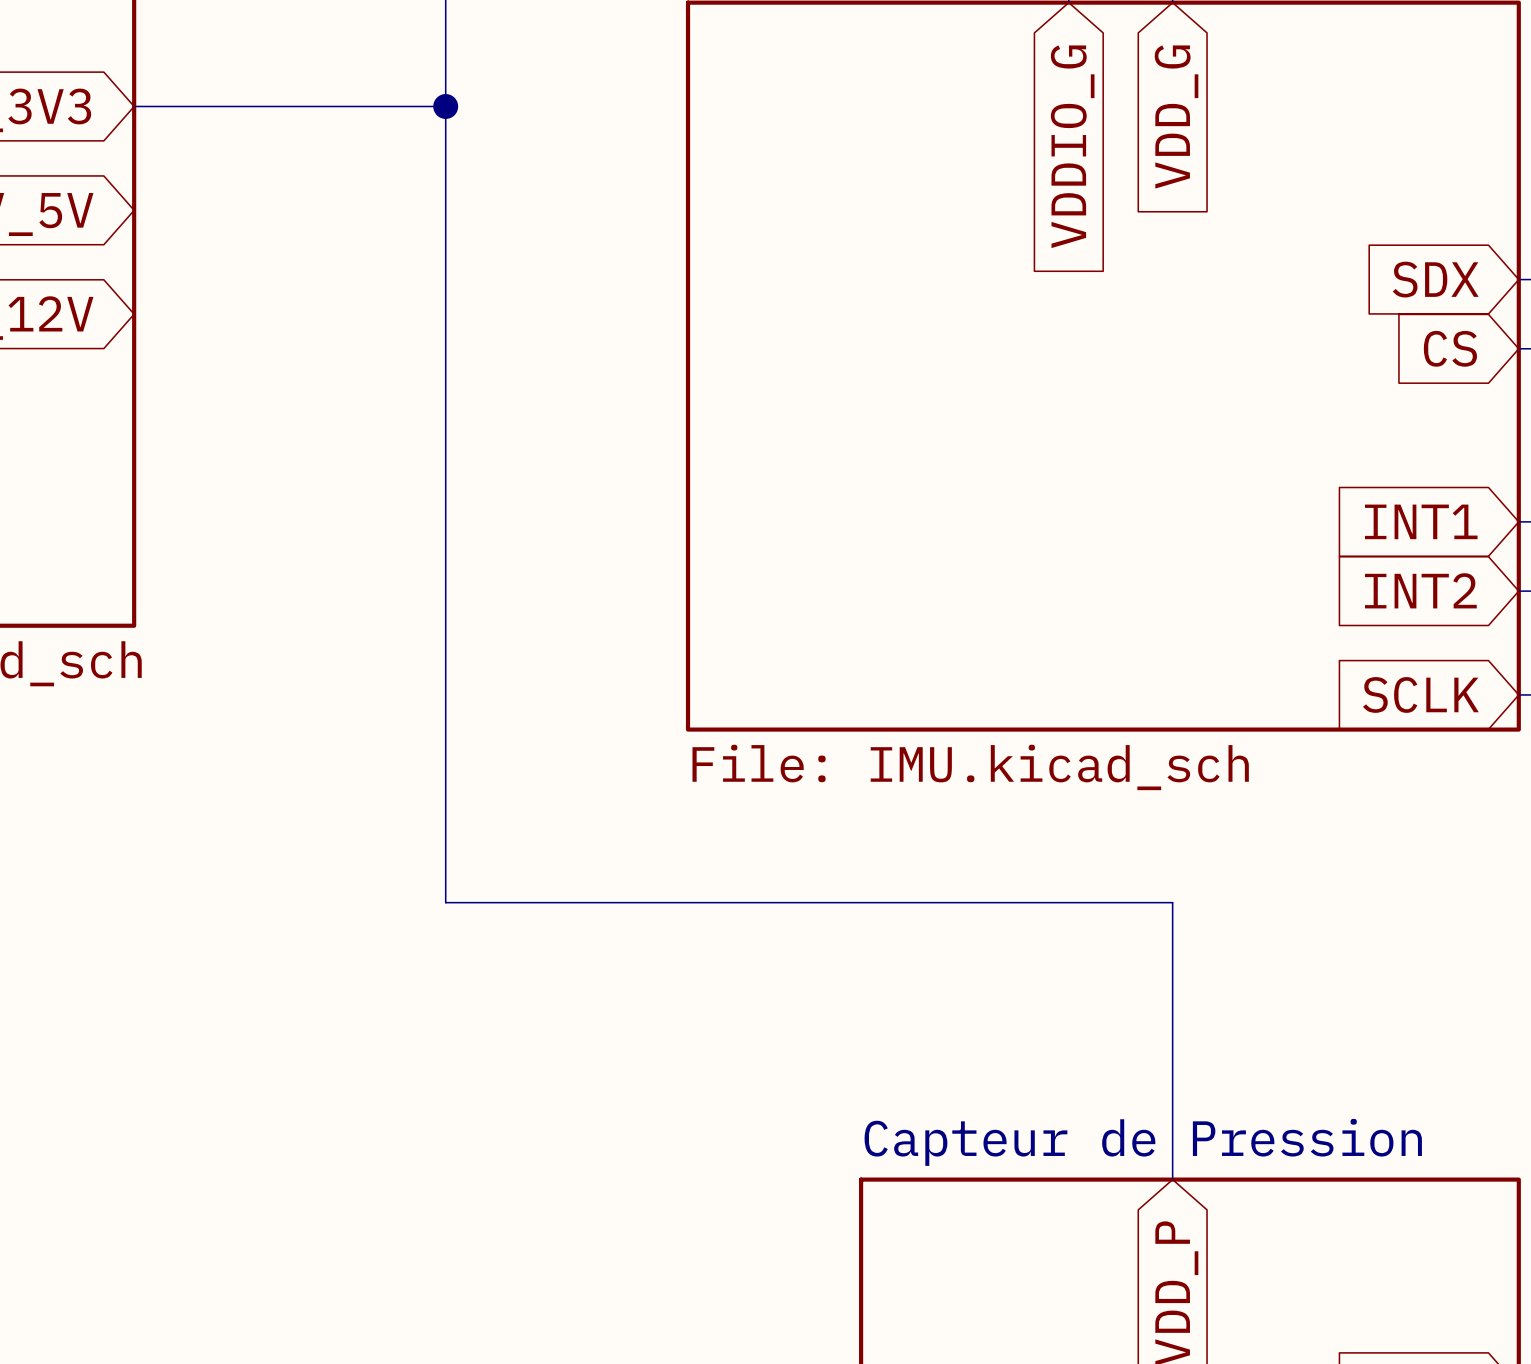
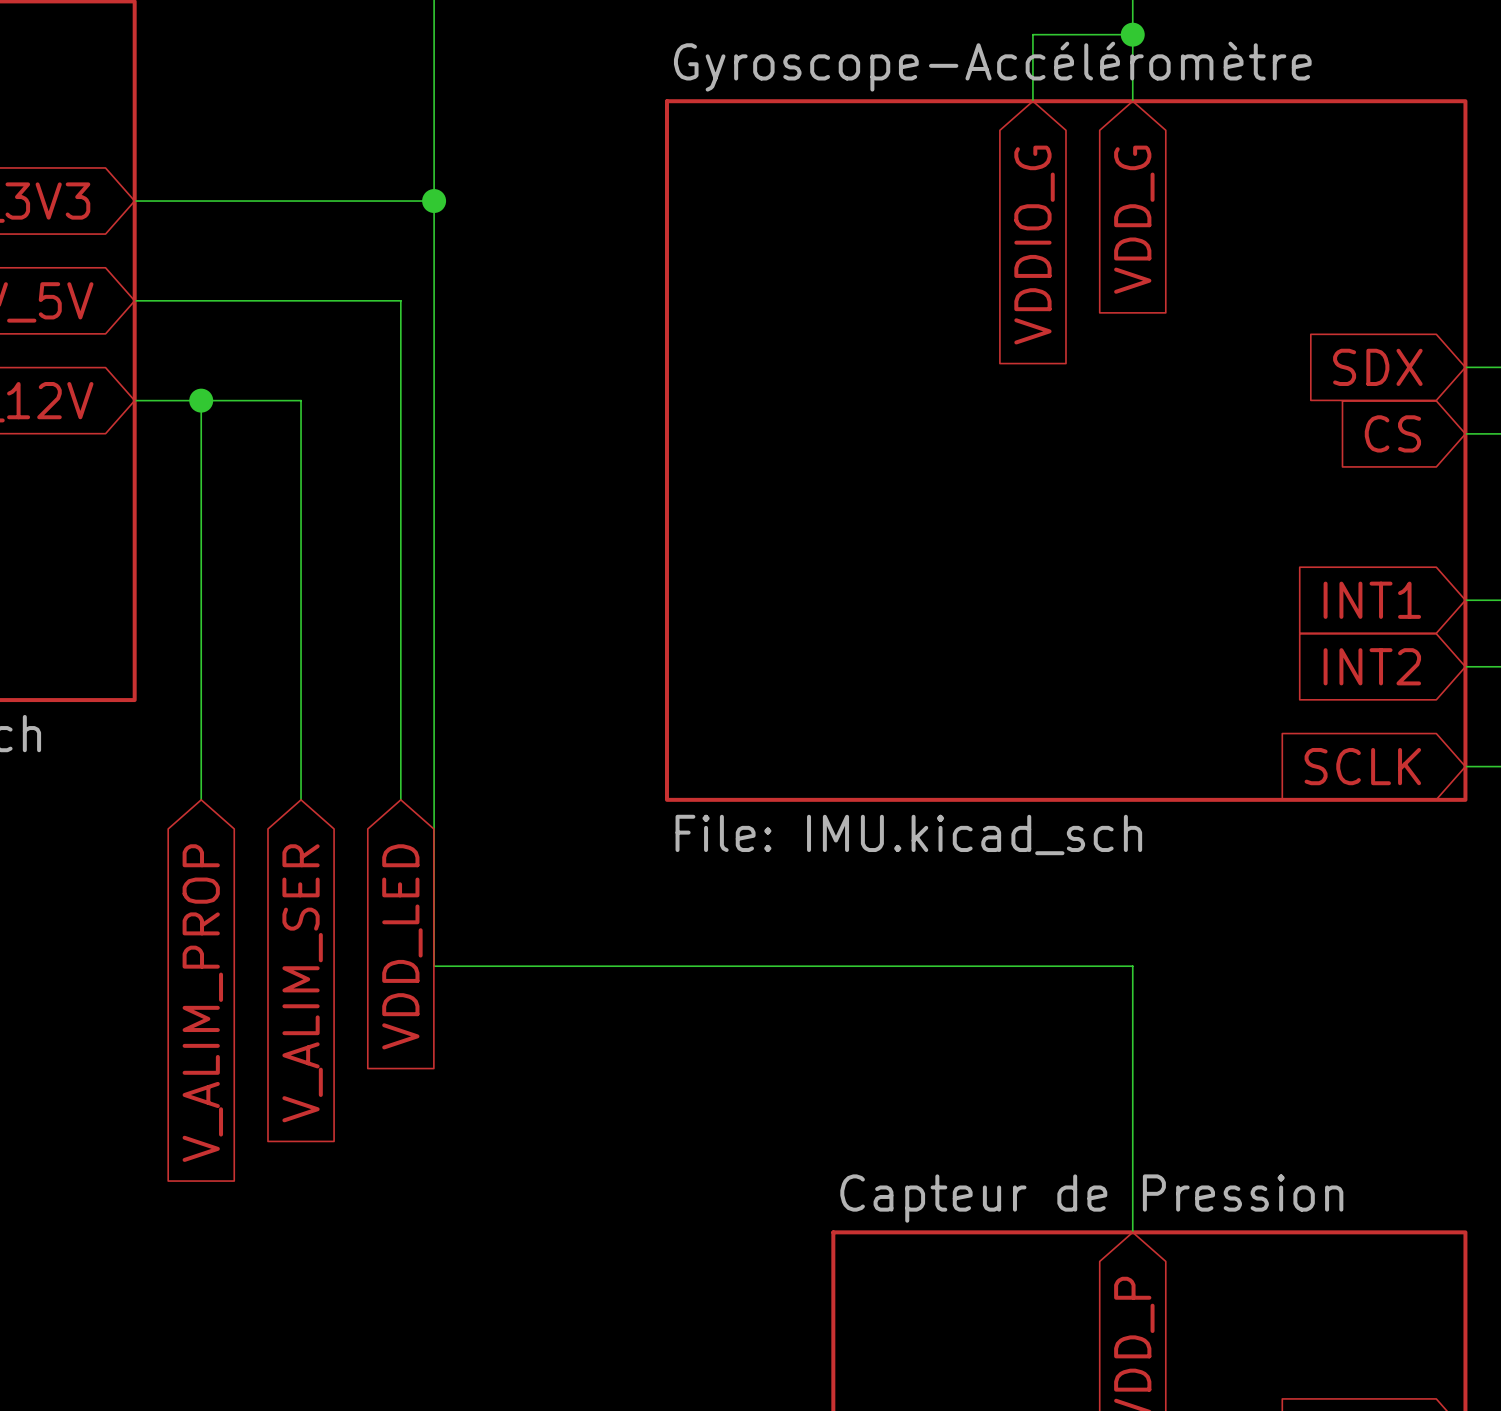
wire: none -> (134, 300) (400, 300) (400, 799)
wire: none -> (134, 400) (301, 400) (301, 799)
wire: none -> (201, 400) (201, 799)
junction: none -> (201, 400)
global label: none -> VDD_LED (402, 946)
global label: none -> V_ALIM_SER (302, 983)
global label: none -> V_ALIM_PROP (202, 1003)

